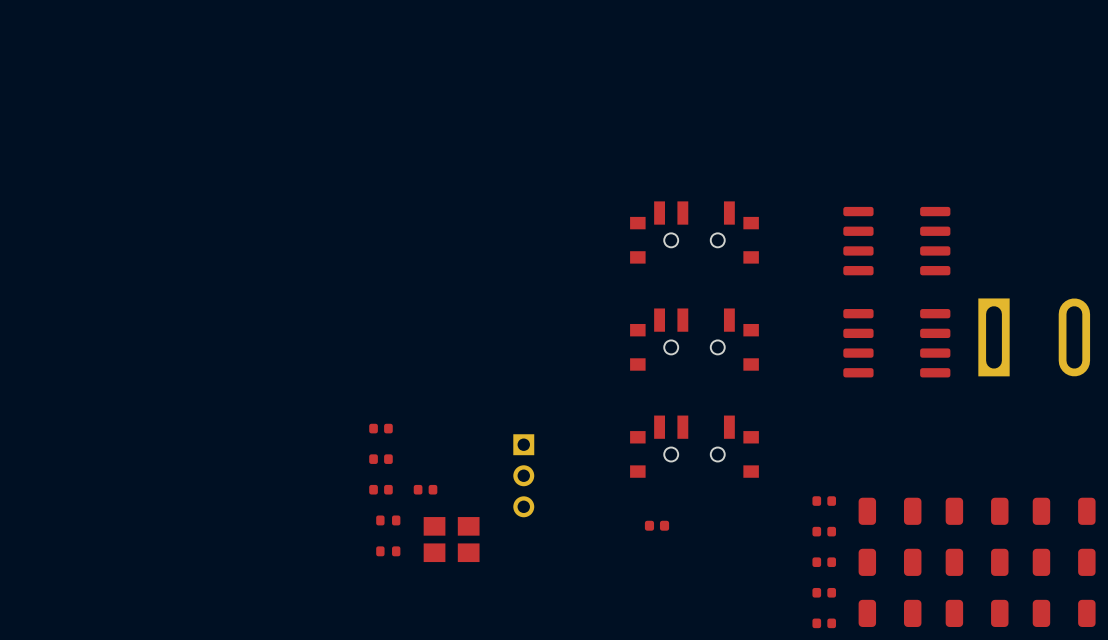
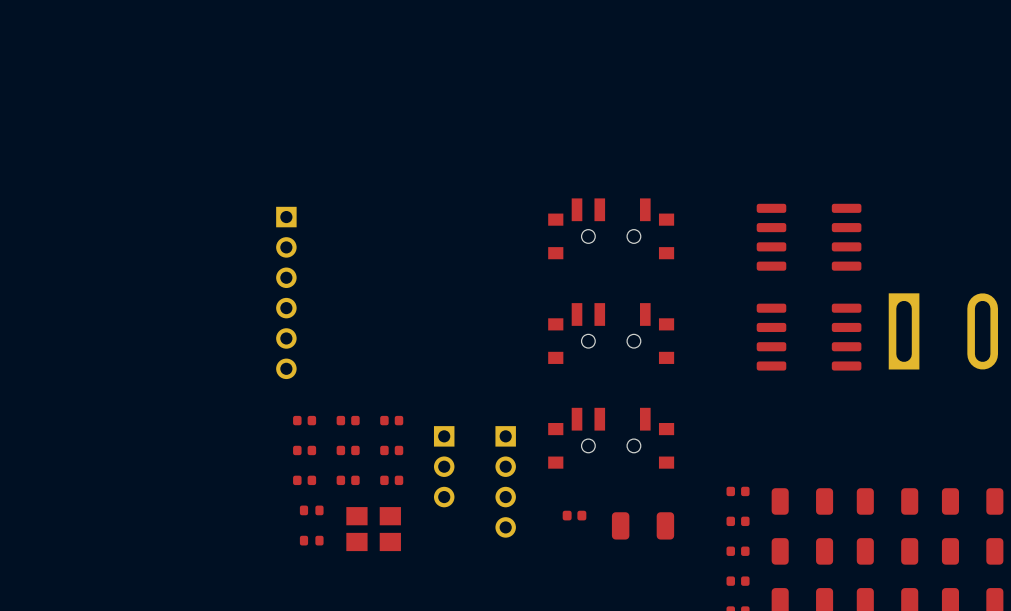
part: none -> (286, 292)
part: none -> (348, 420)
part: none -> (391, 420)
part: none -> (348, 450)
part: none -> (391, 450)
part: none -> (391, 480)
part: none -> (505, 481)
part: none -> (643, 525)

